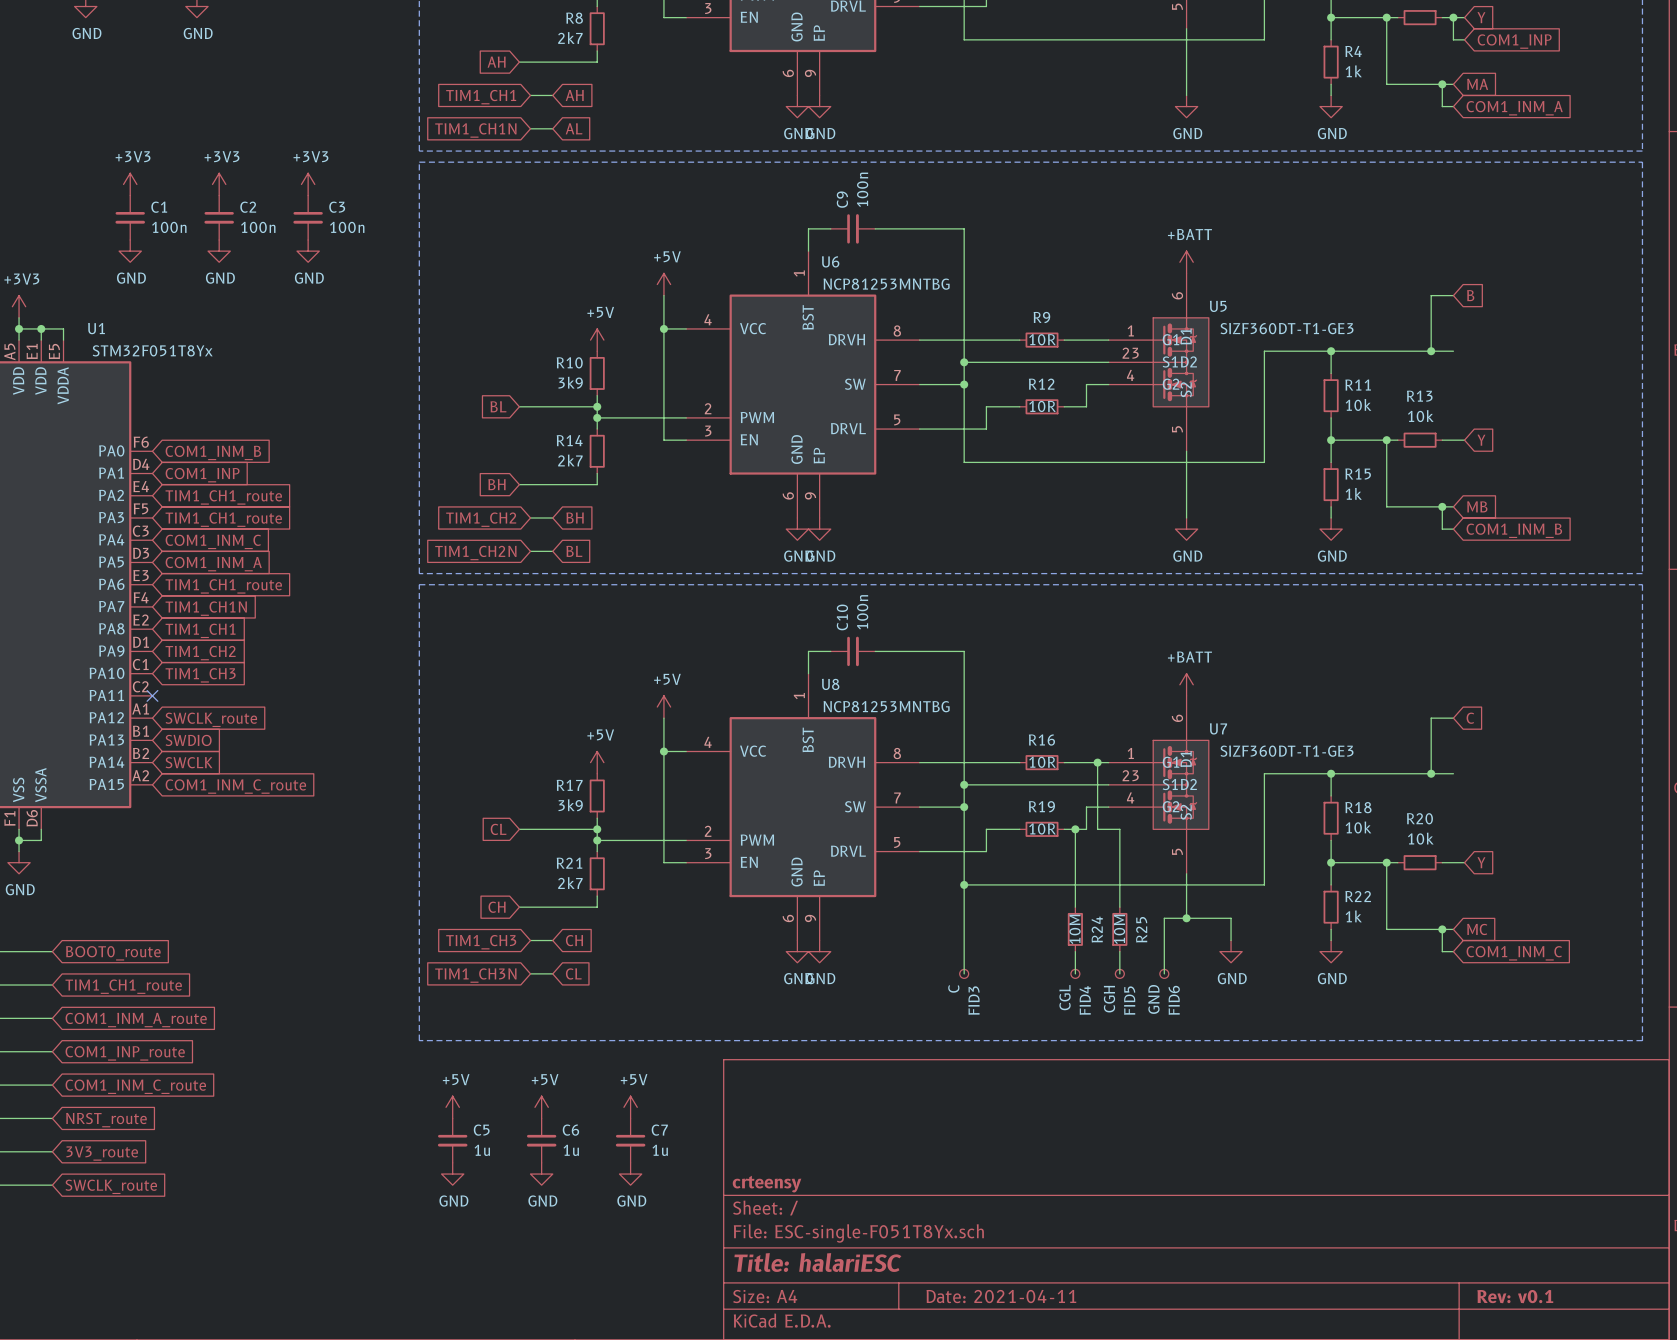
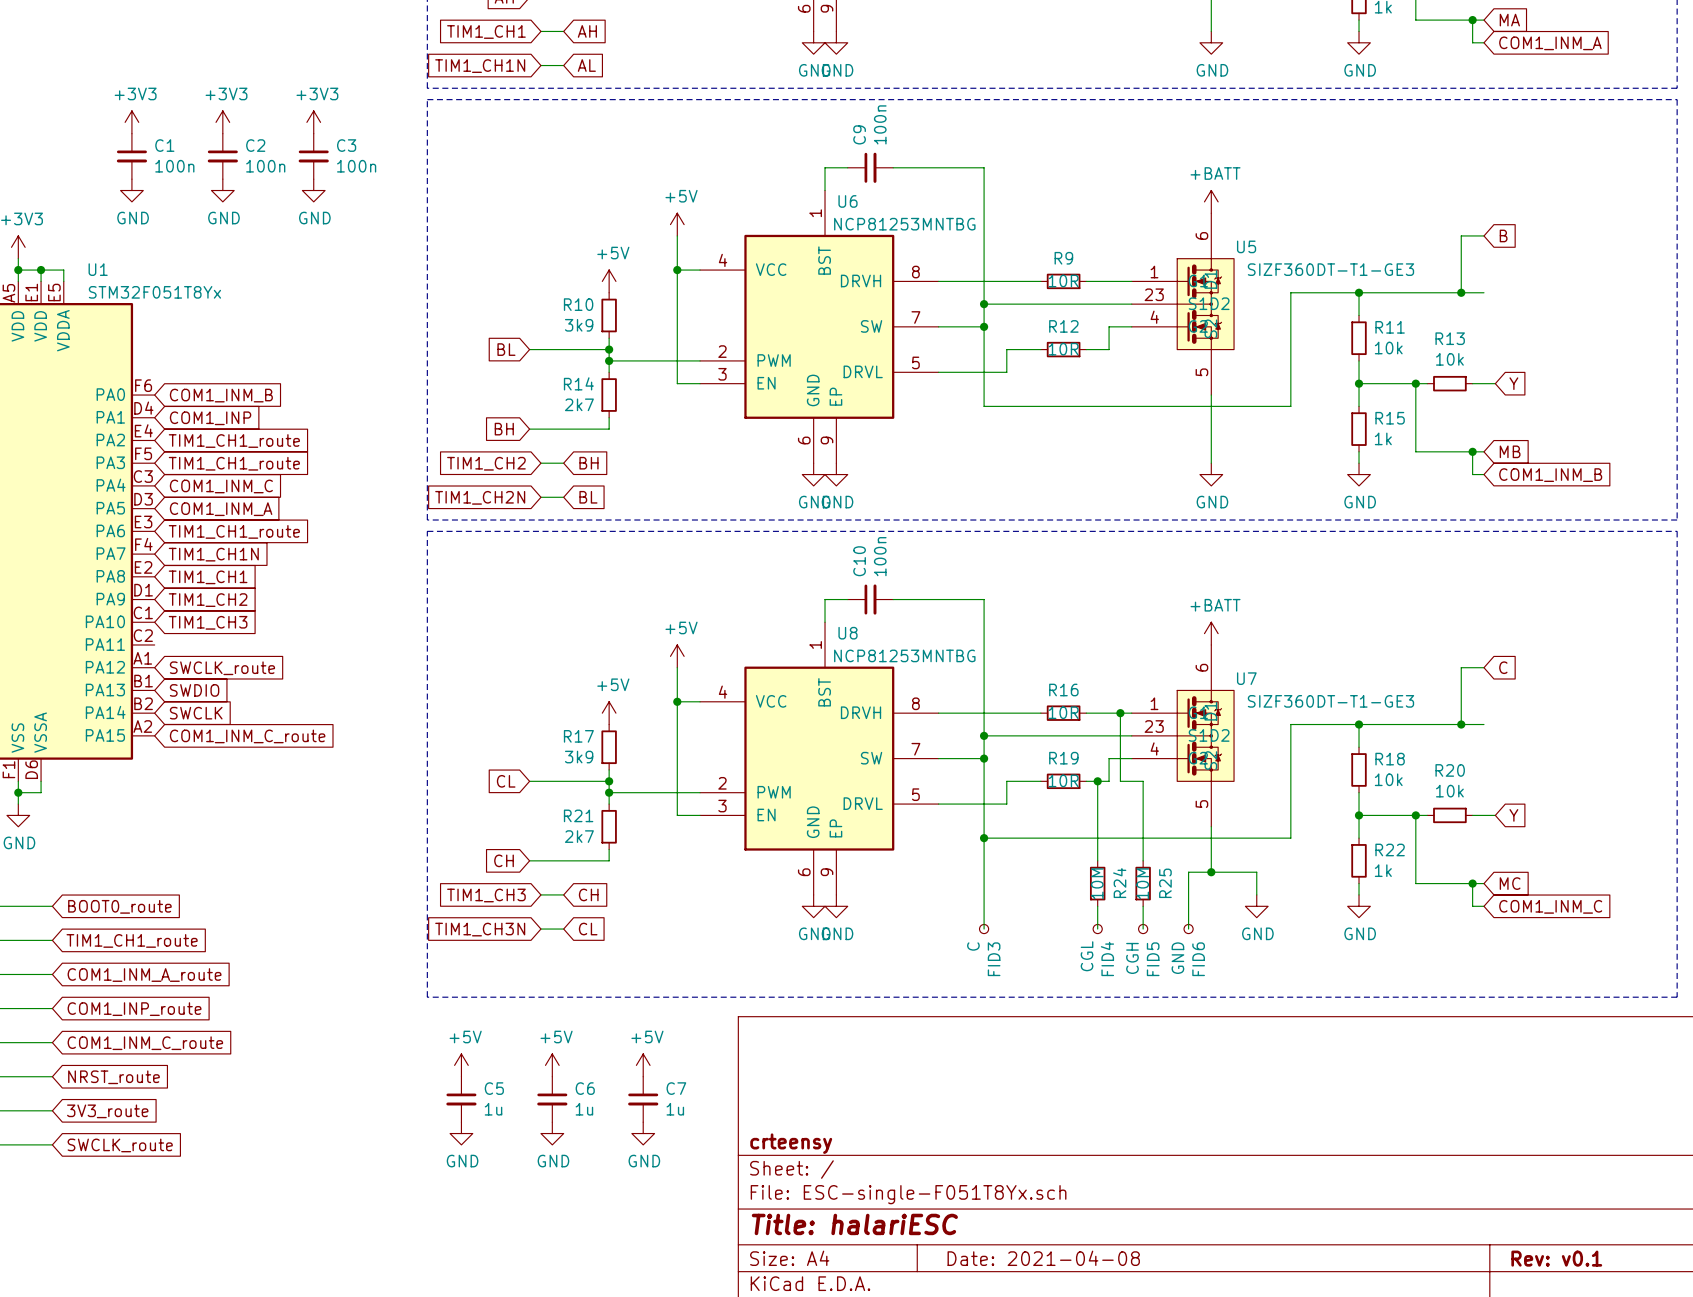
no-connect mark: (152, 695) -> none
title block: Date: 2021-04-11 (1001, 1296) -> Date: 2021-04-08 (1043, 1258)

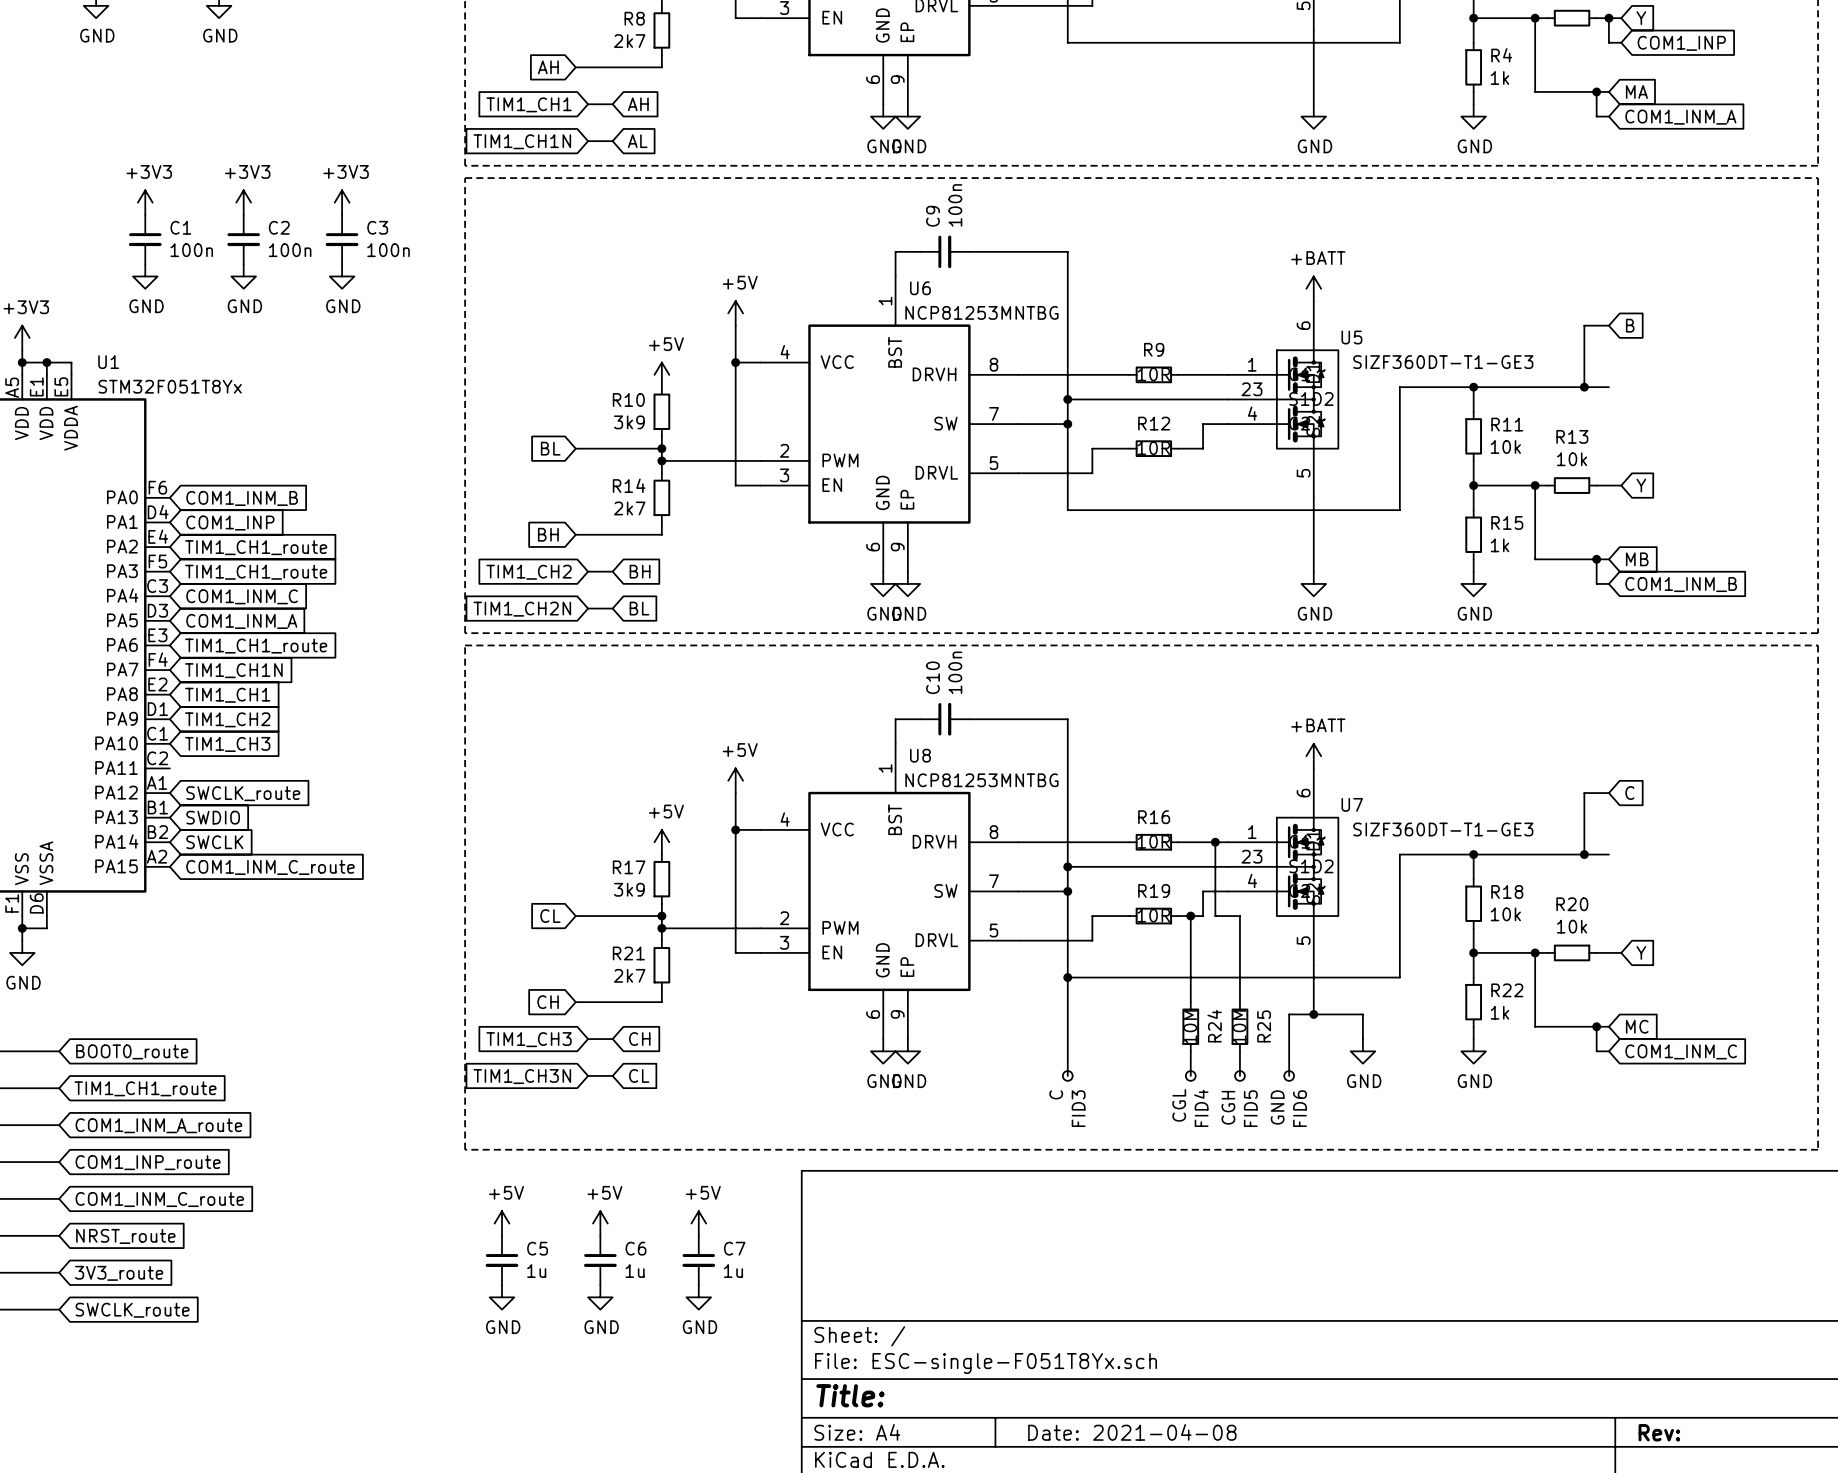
title block: crteensy (791, 1143) -> none
title block: Title: halariESC (854, 1224) -> Title: (850, 1395)
title block: Rev: v0.1 (1556, 1258) -> Rev: (1659, 1432)

